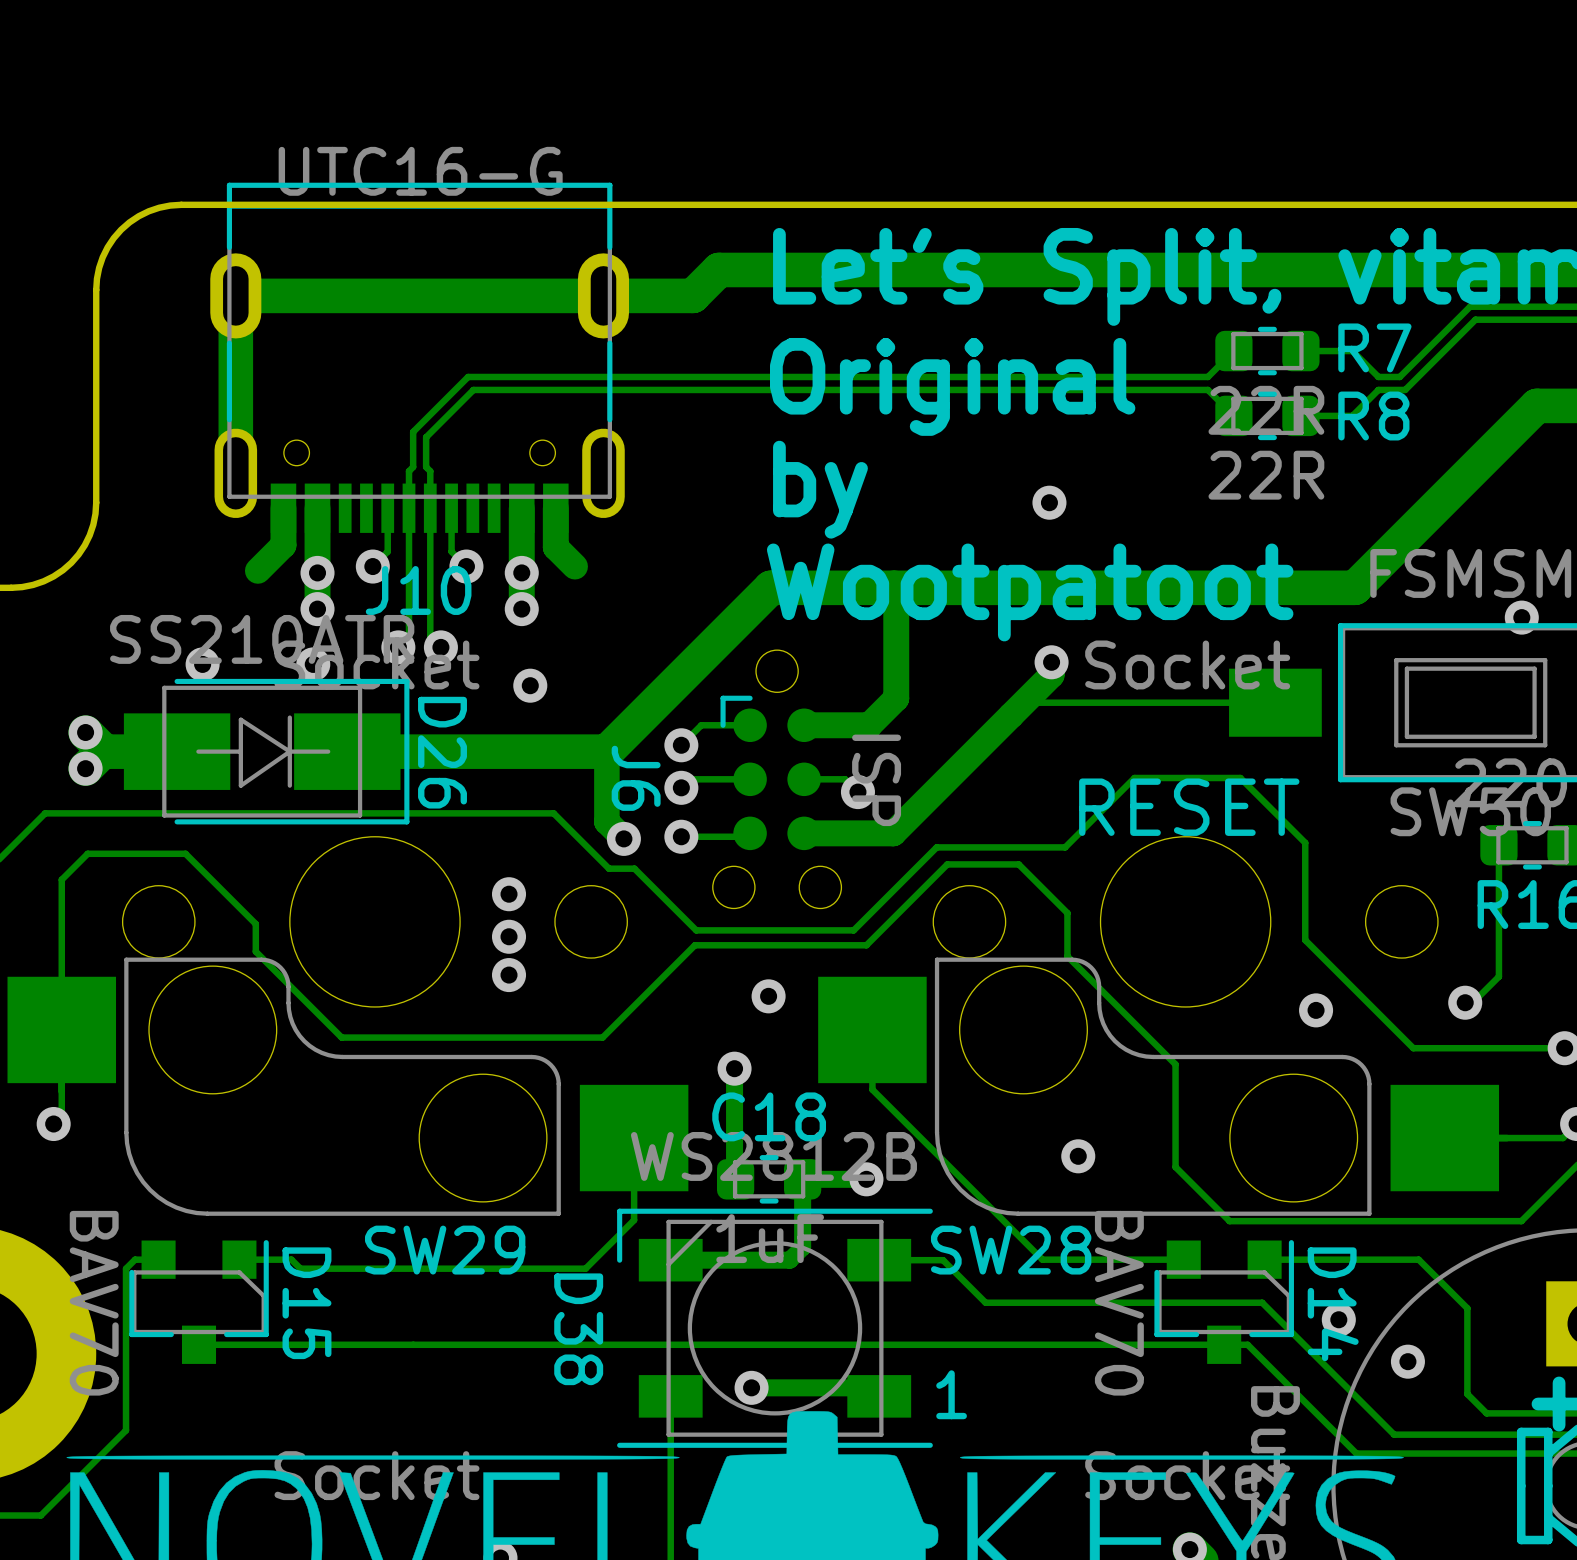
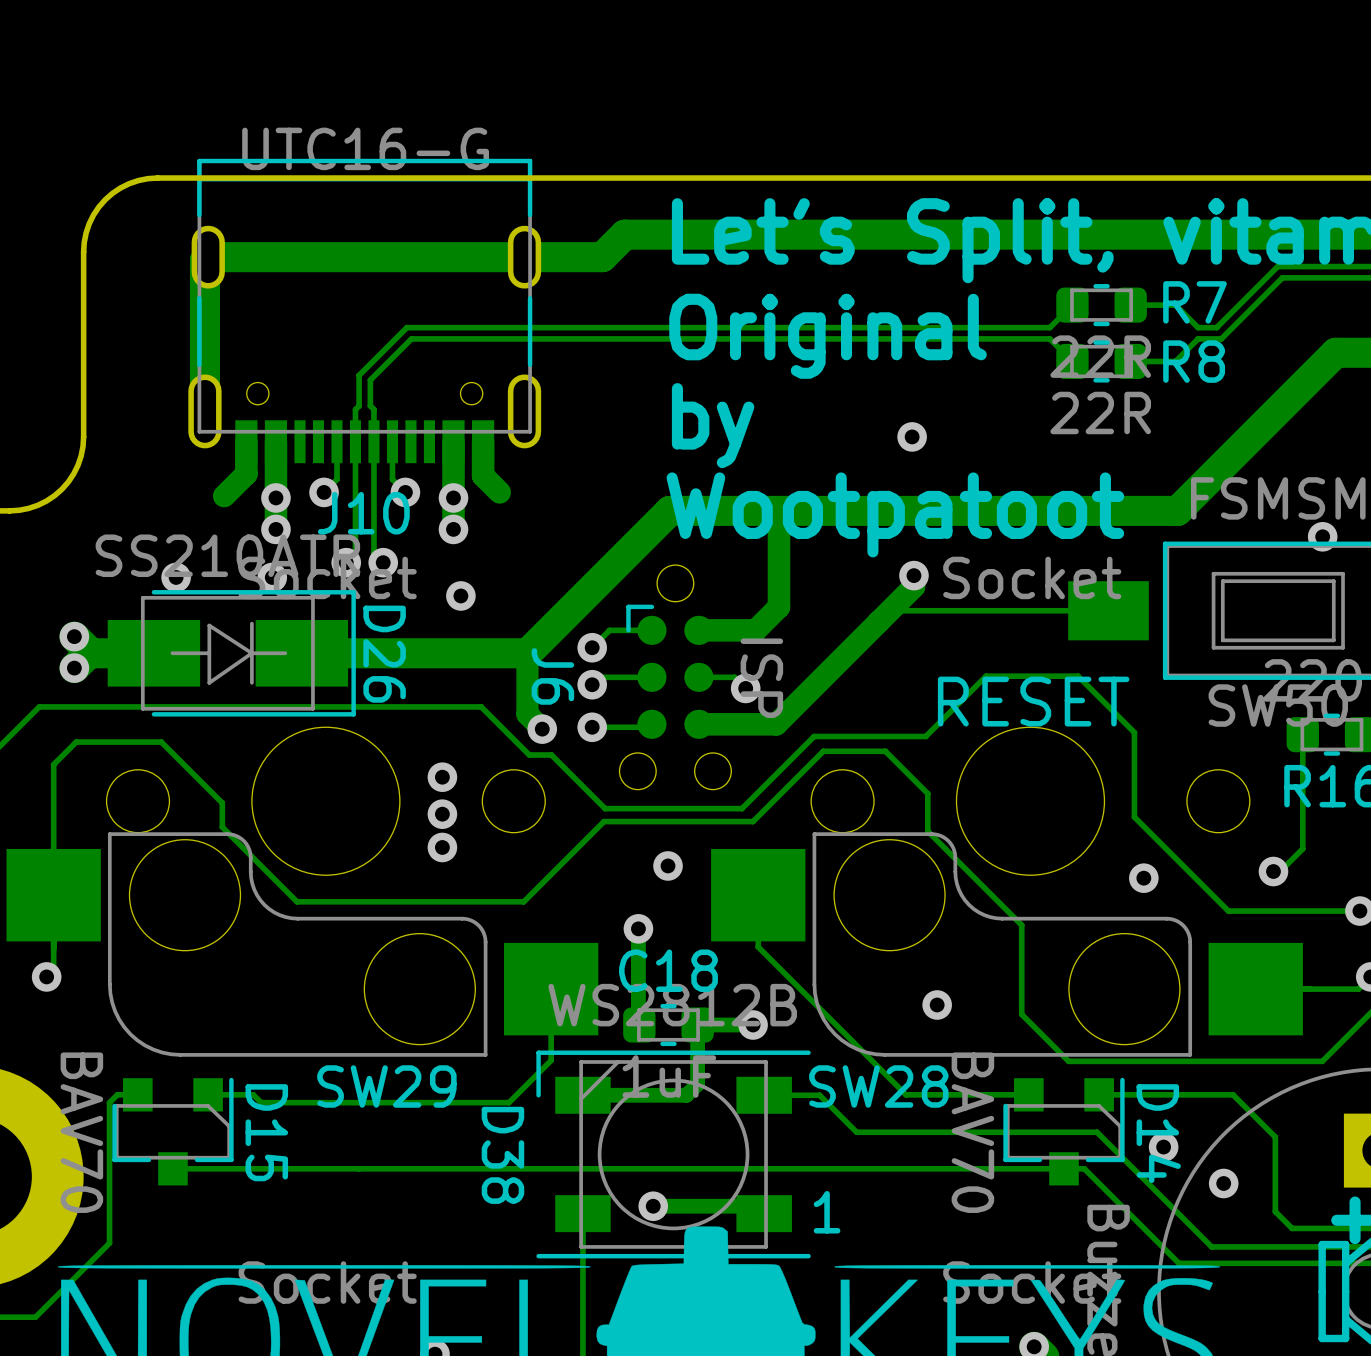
J10 footprint: [210, 182, 630, 533] -> [188, 158, 542, 464]

